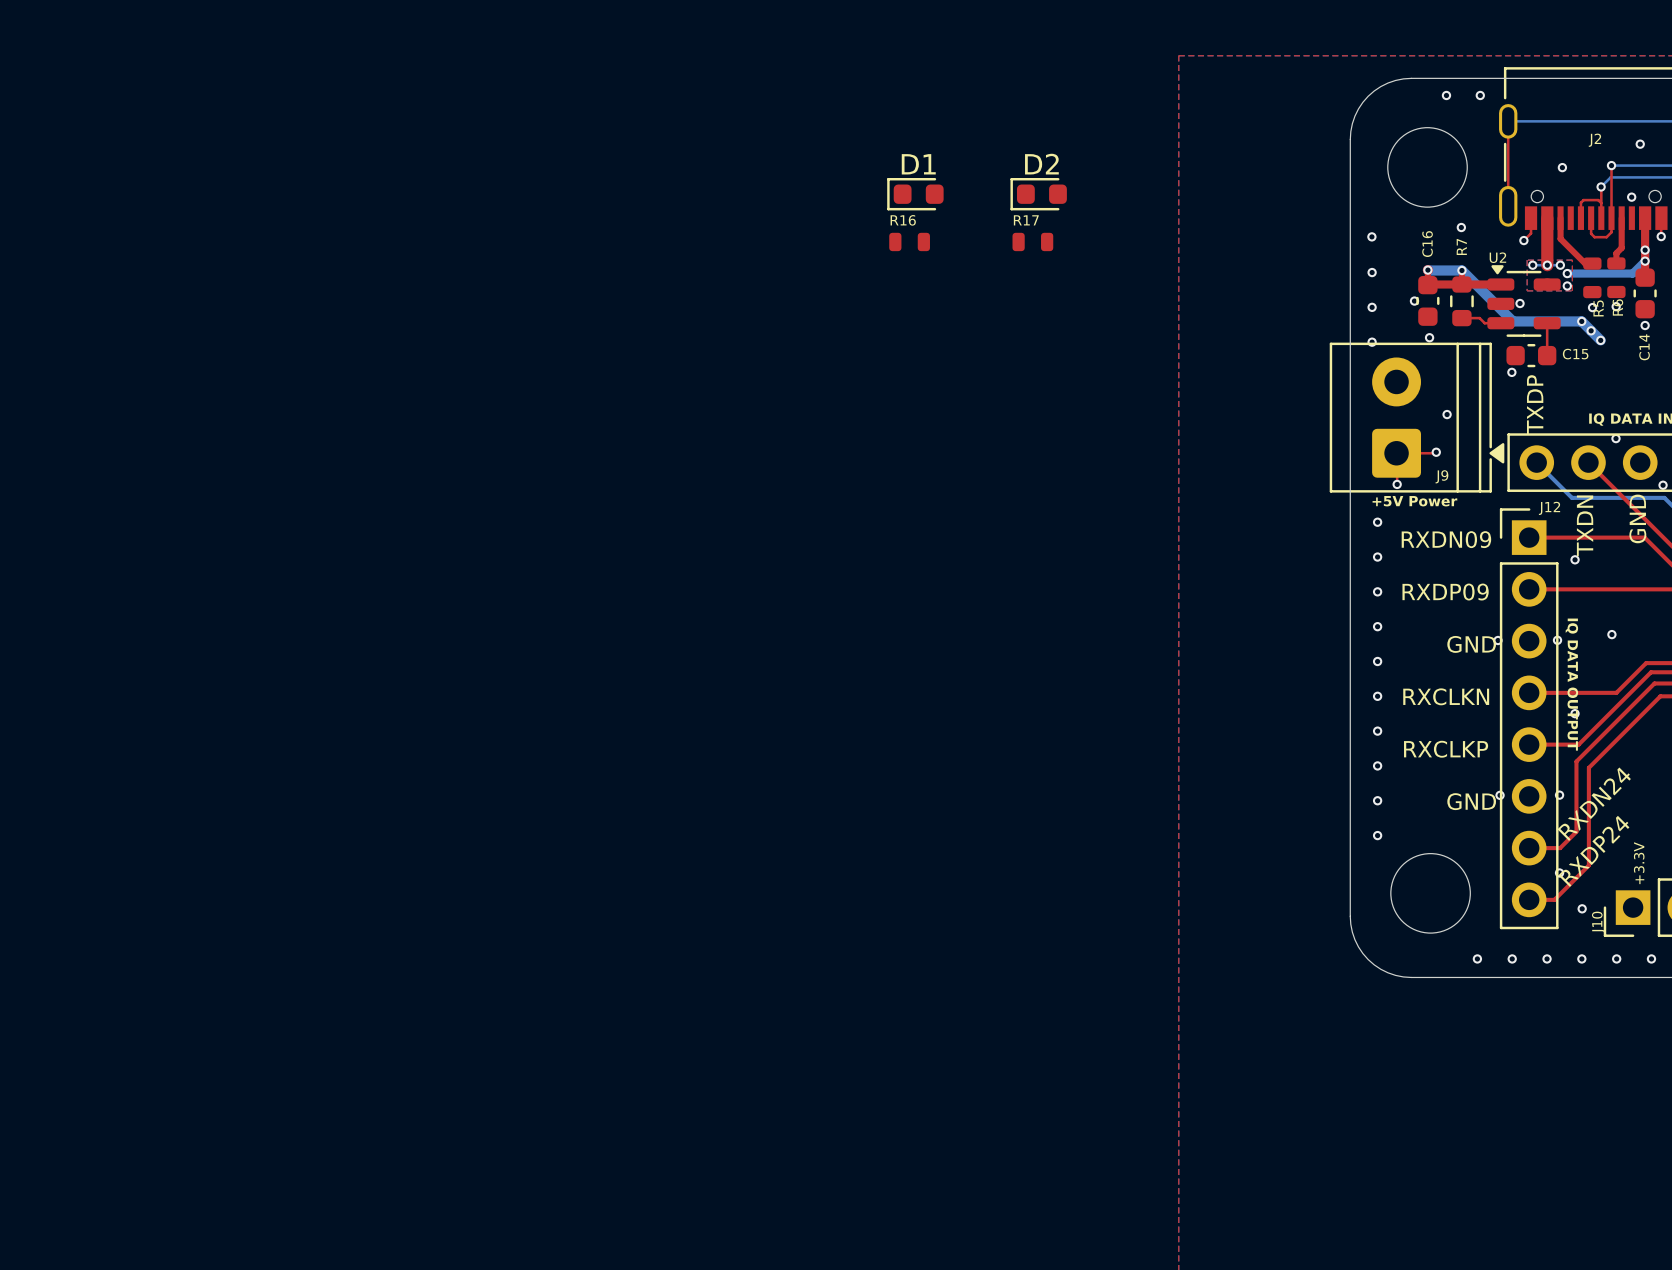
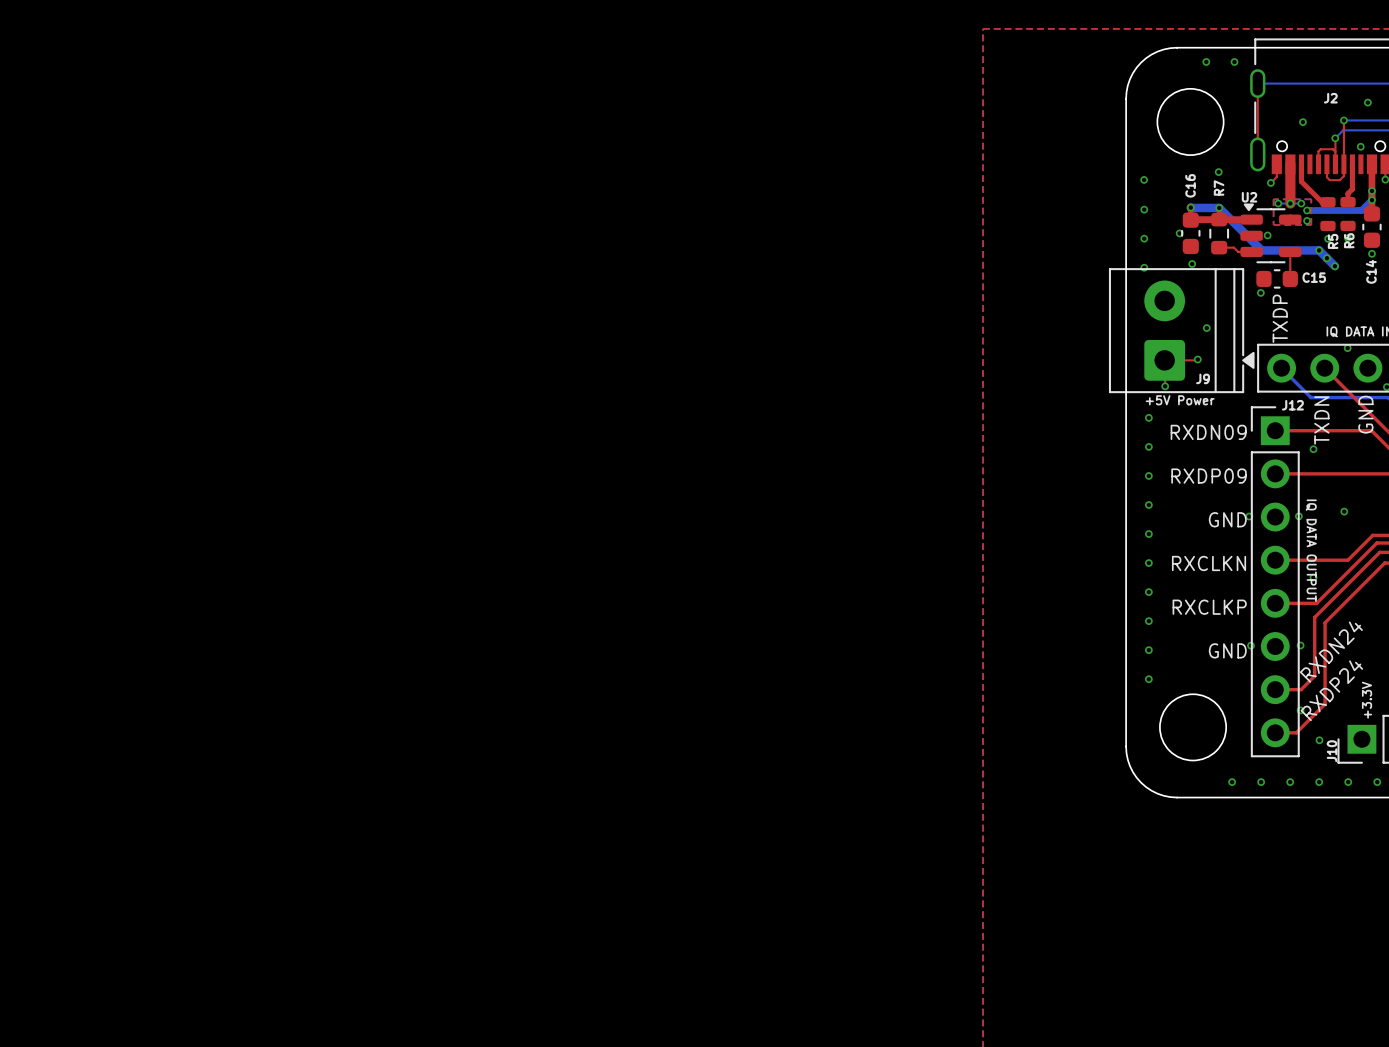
D1: (915, 194) -> none
D2: (1038, 194) -> none
R16: (909, 241) -> none
R17: (1032, 241) -> none

